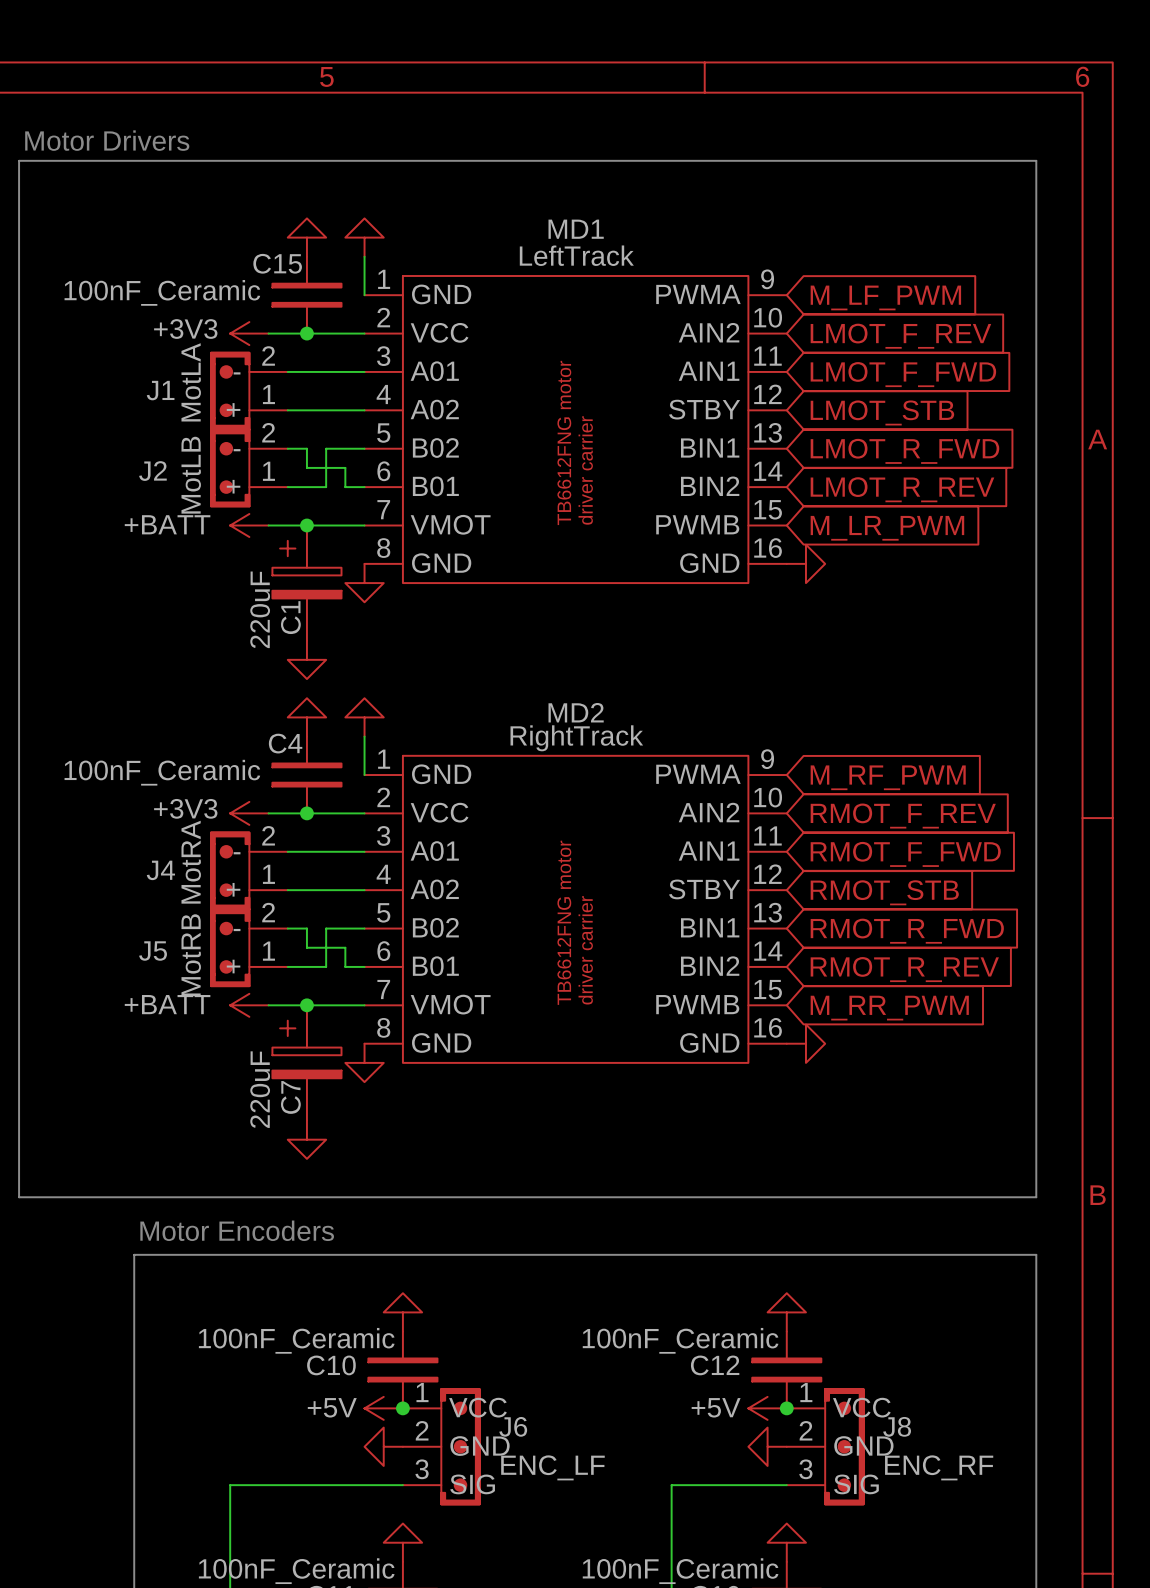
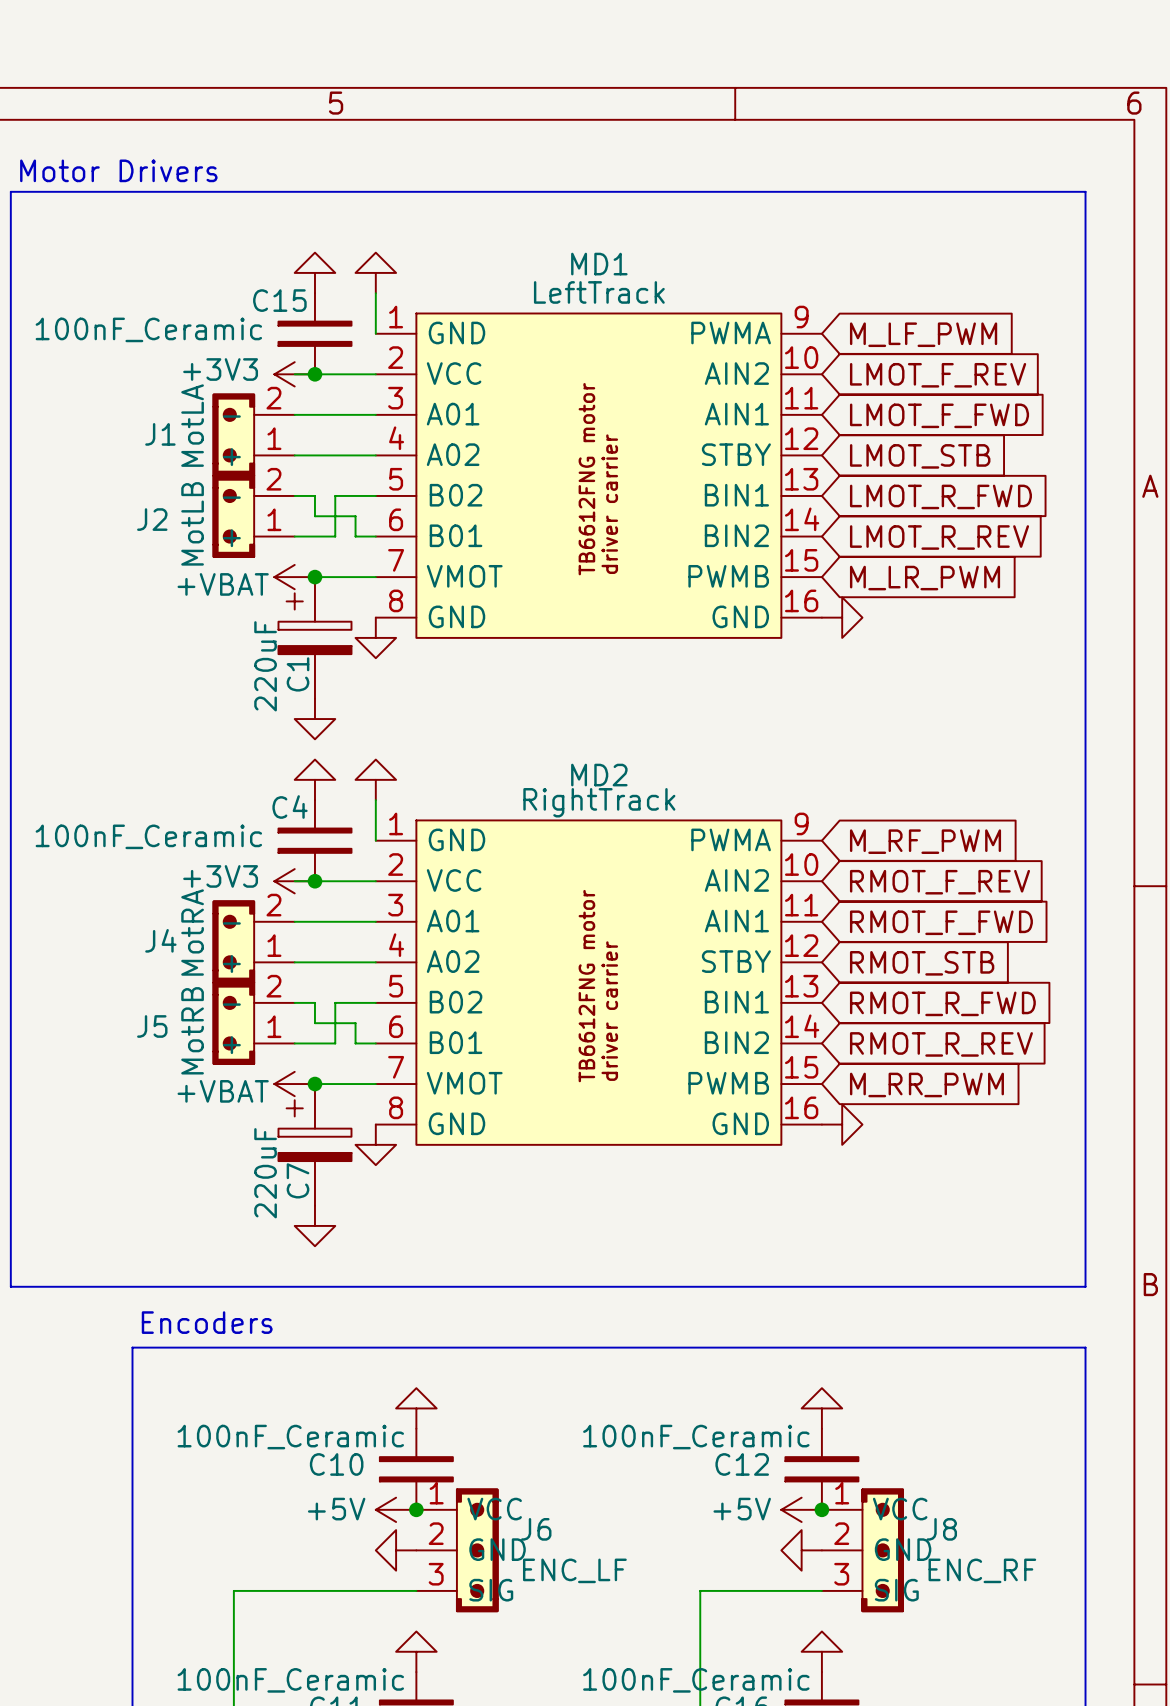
power symbol position: +3V3 (249, 333) -> +3V3 (294, 374)
power symbol: +BATT (249, 525) -> none
power symbol: none -> +VBAT (294, 577)
power symbol position: +3V3 (249, 813) -> +3V3 (294, 881)
power symbol: +BATT (249, 1005) -> none
power symbol: none -> +VBAT (294, 1084)
text: Motor Encoders (237, 1230) -> Encoders (207, 1322)

